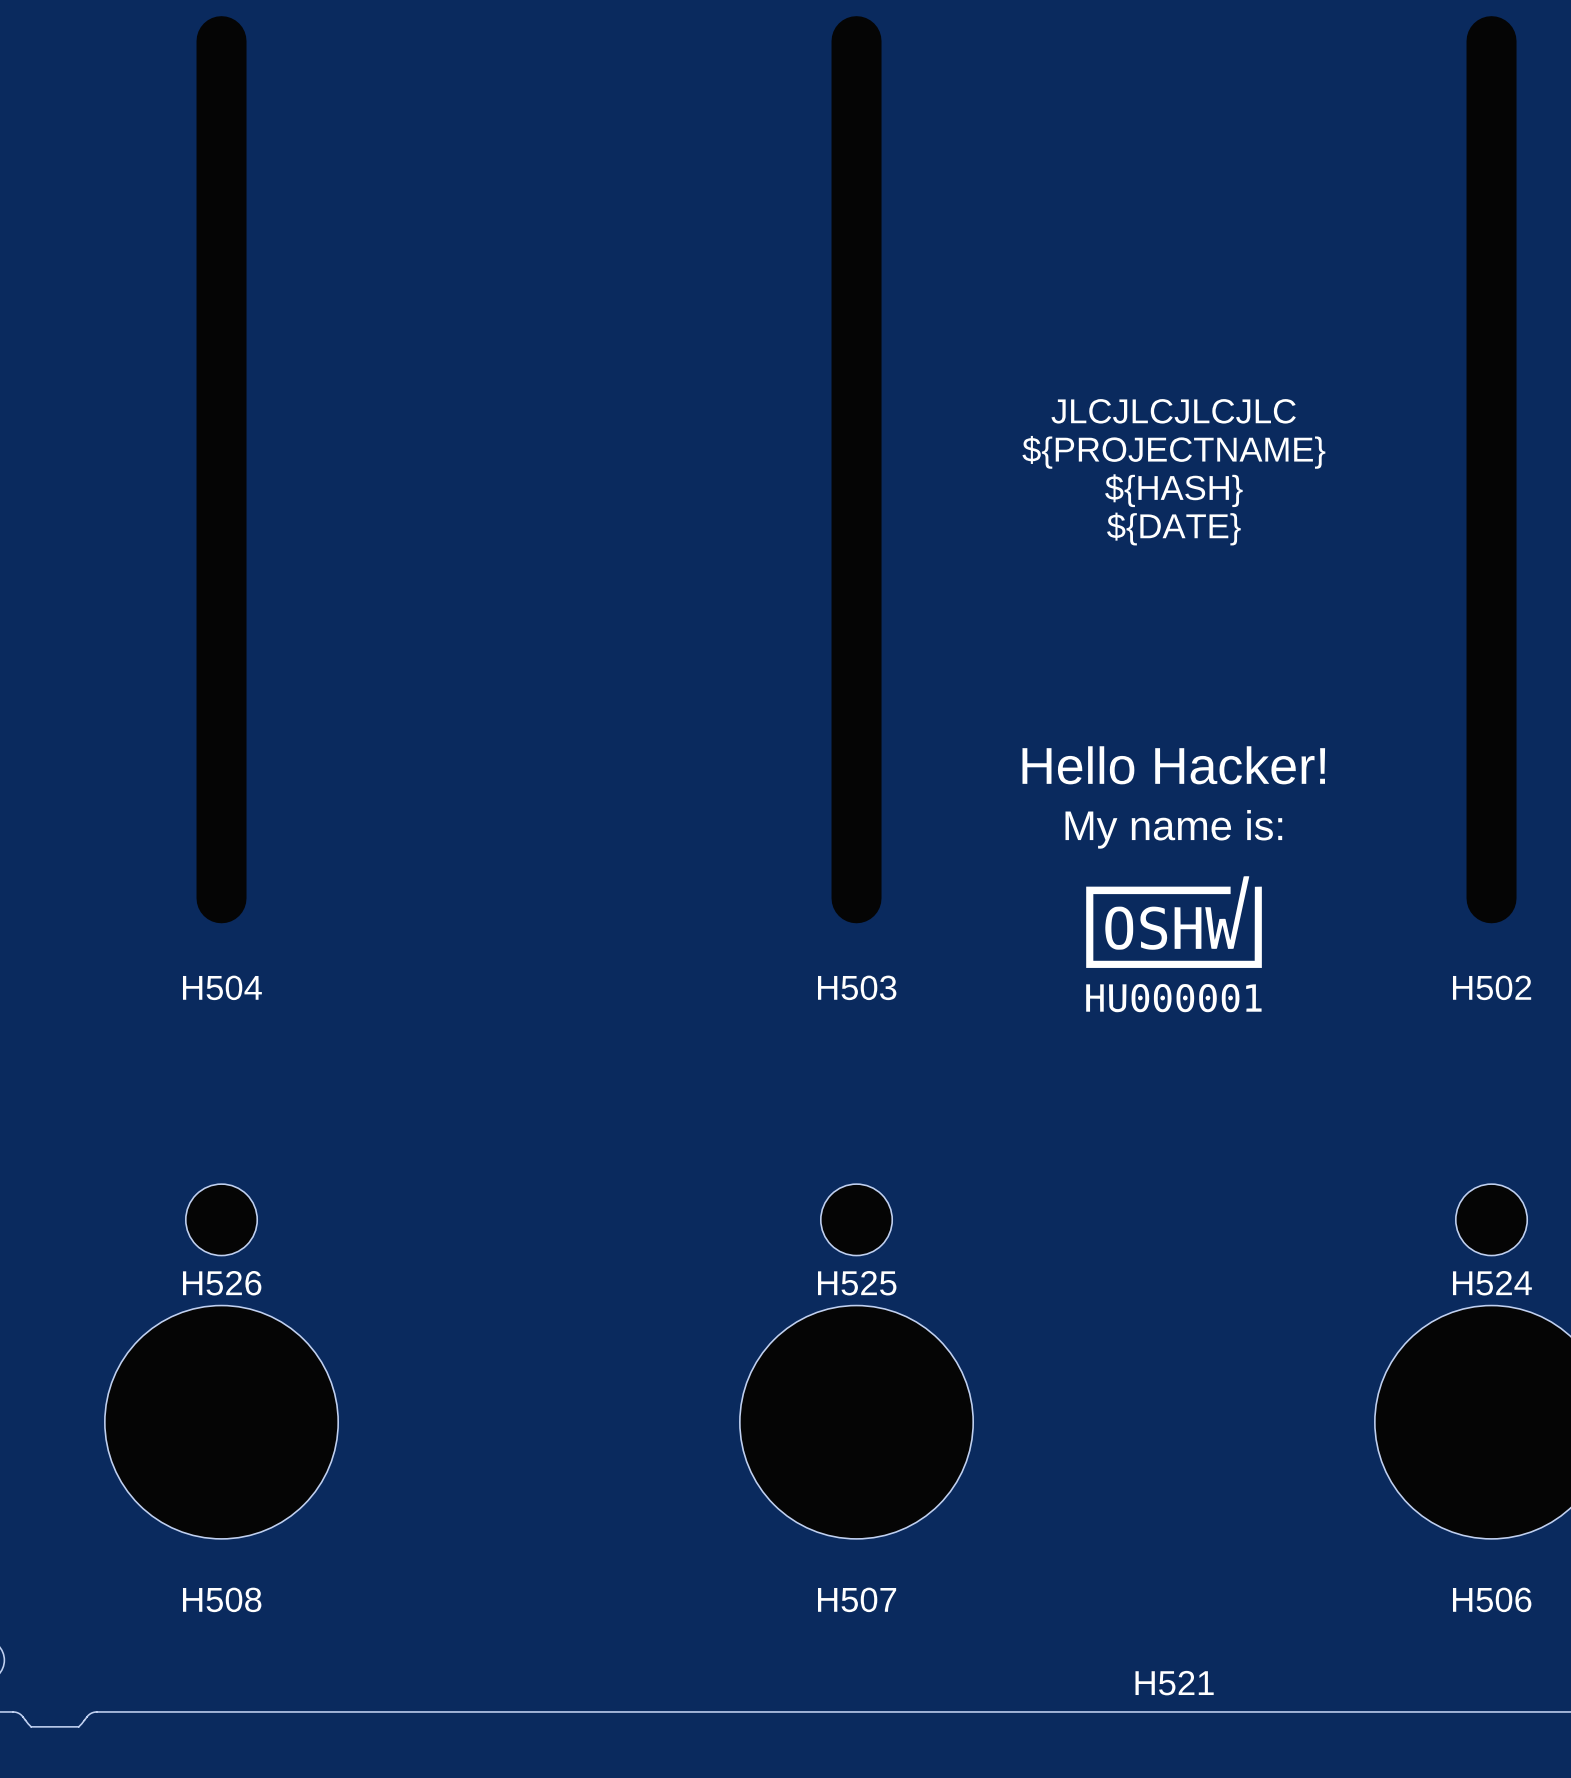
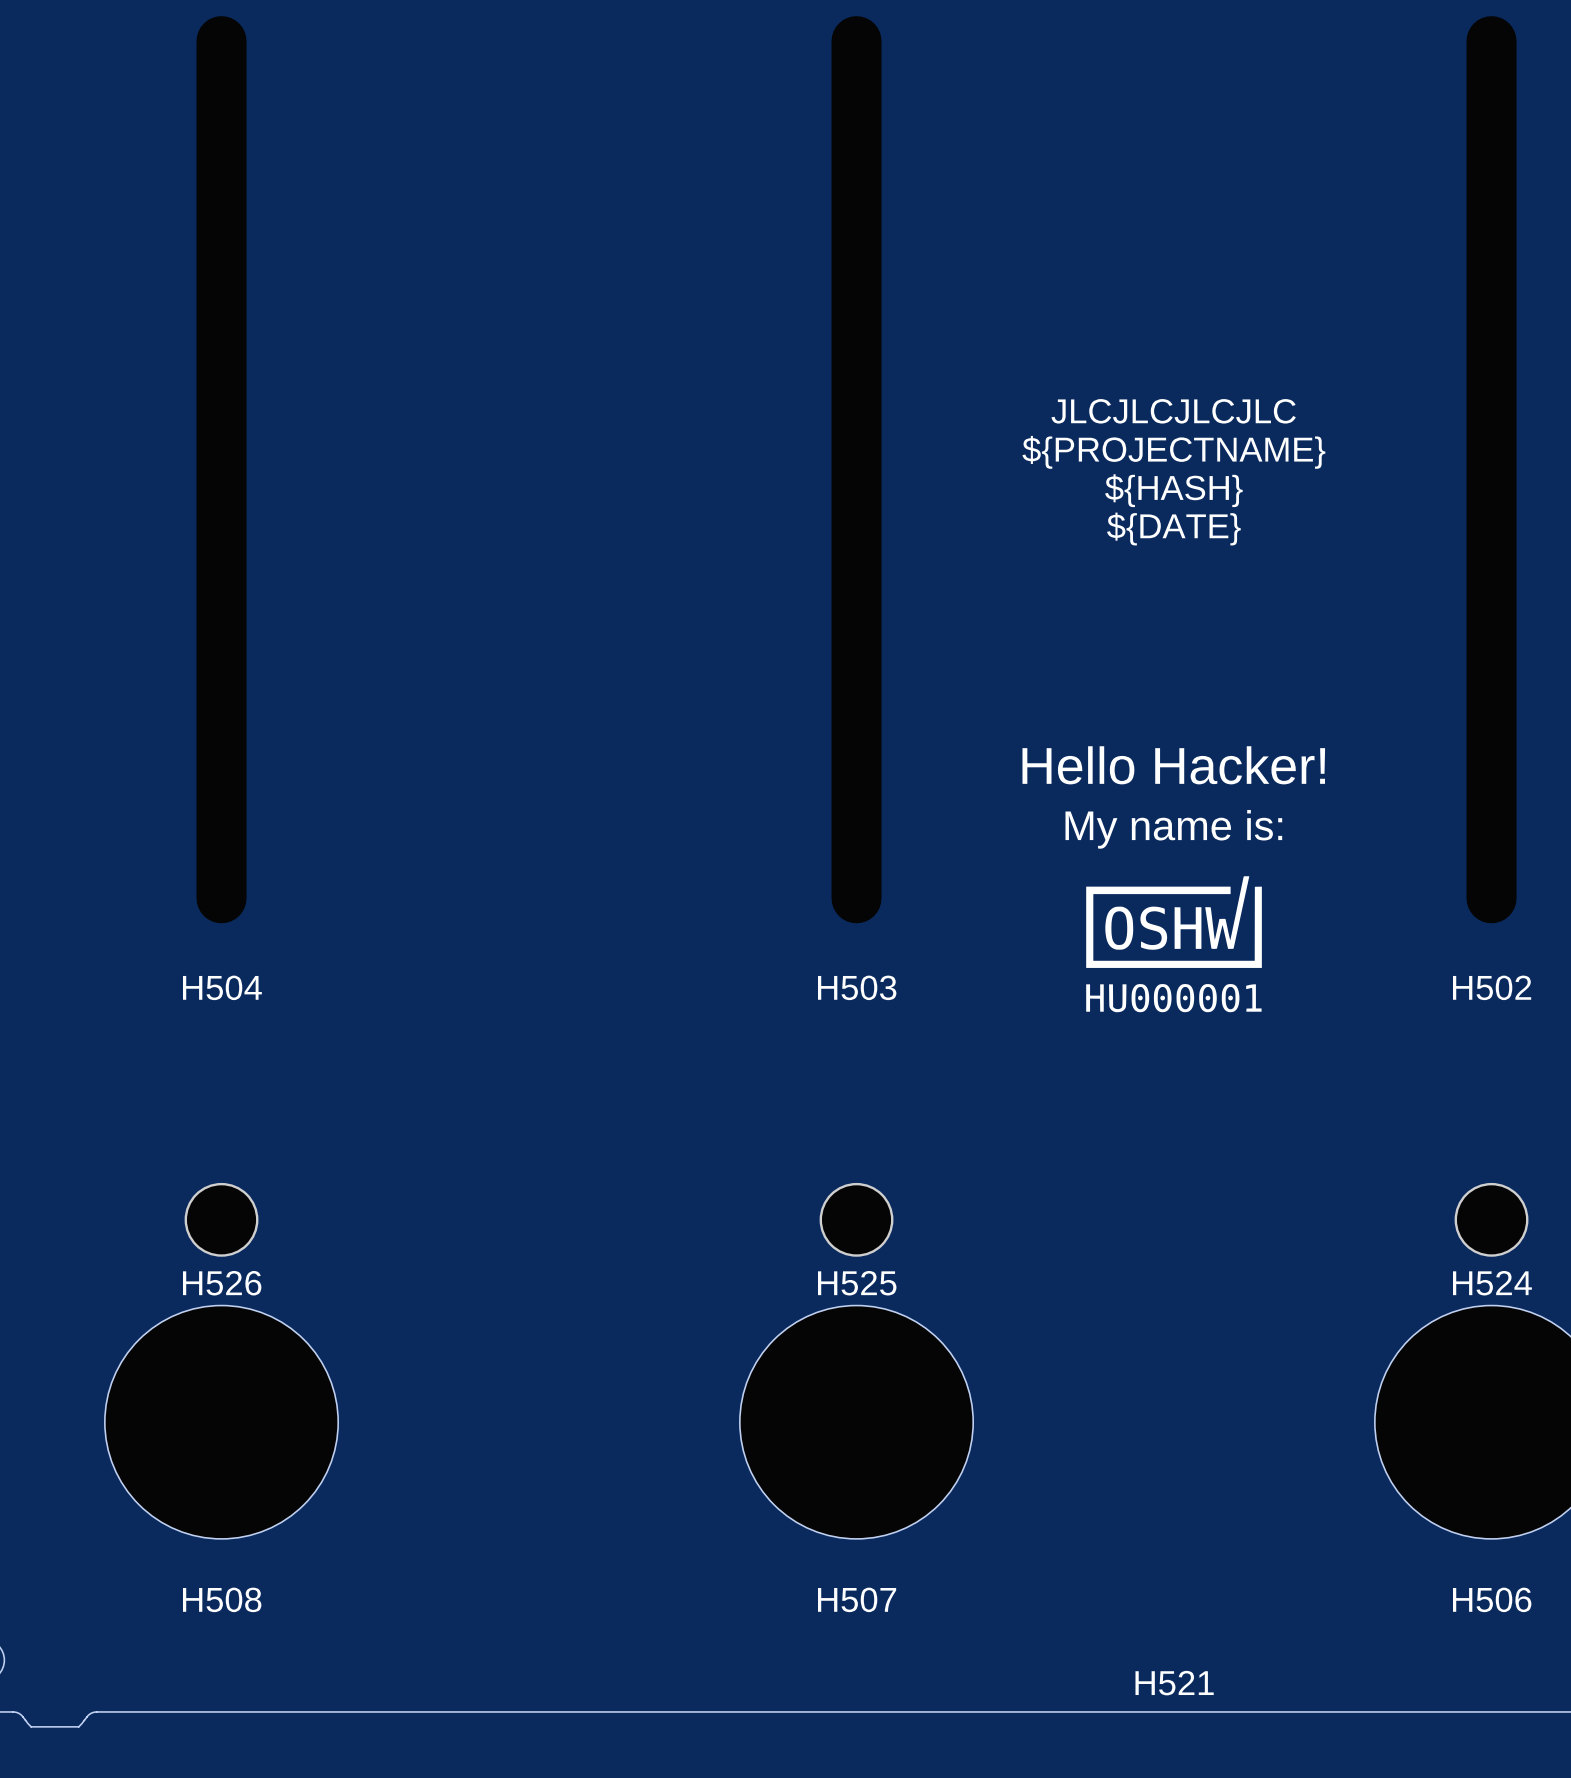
H526 footprint: [185, 1184, 258, 1256] -> [184, 1182, 259, 1257]
H525 footprint: [820, 1184, 893, 1256] -> [819, 1182, 894, 1257]
H524 footprint: [1455, 1184, 1528, 1256] -> [1454, 1182, 1529, 1257]

